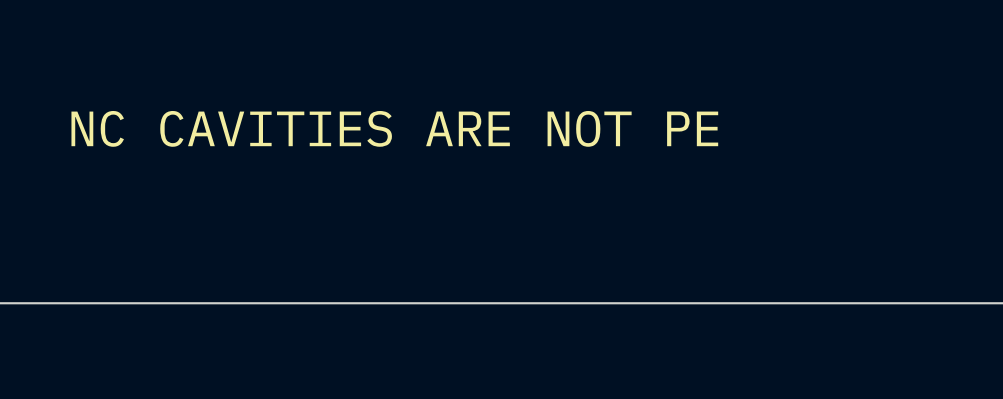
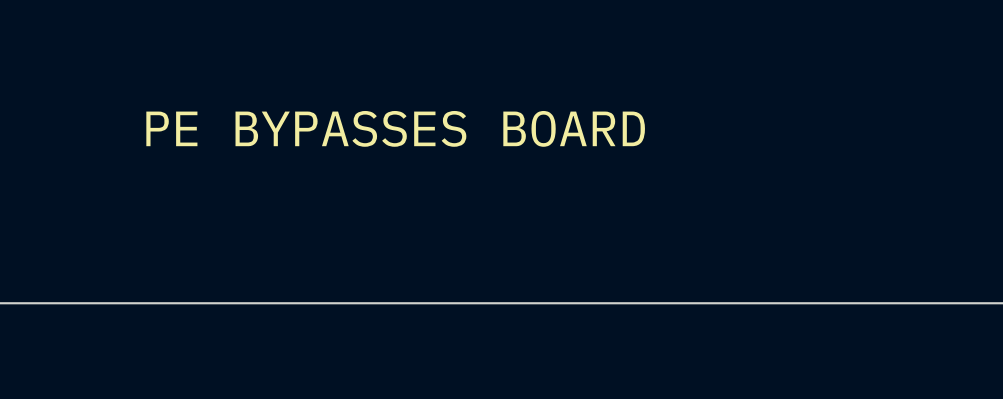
text: NC CAVITIES ARE NOT PE (394, 128) -> PE BYPASSES BOARD (395, 128)

